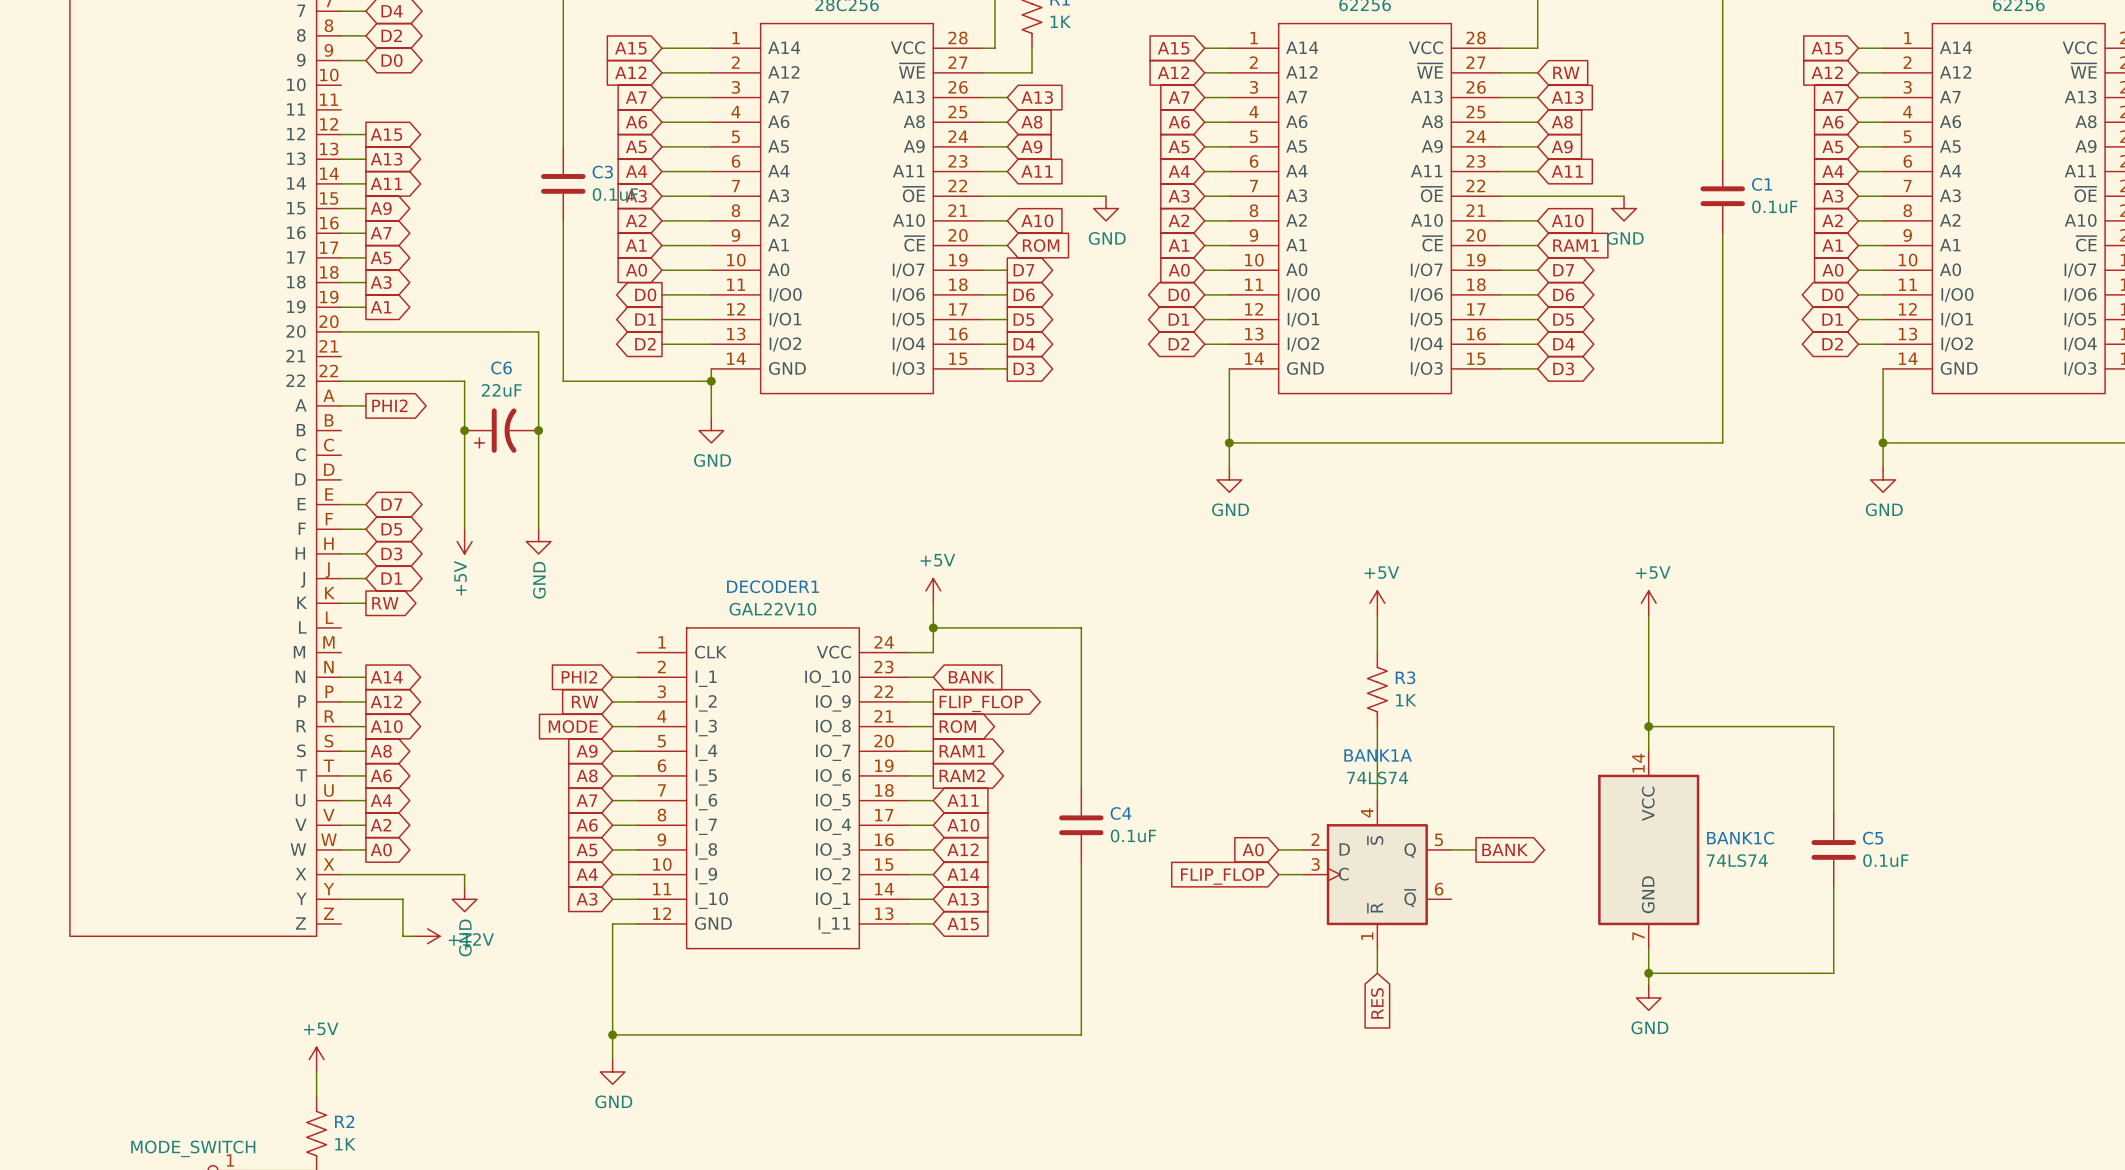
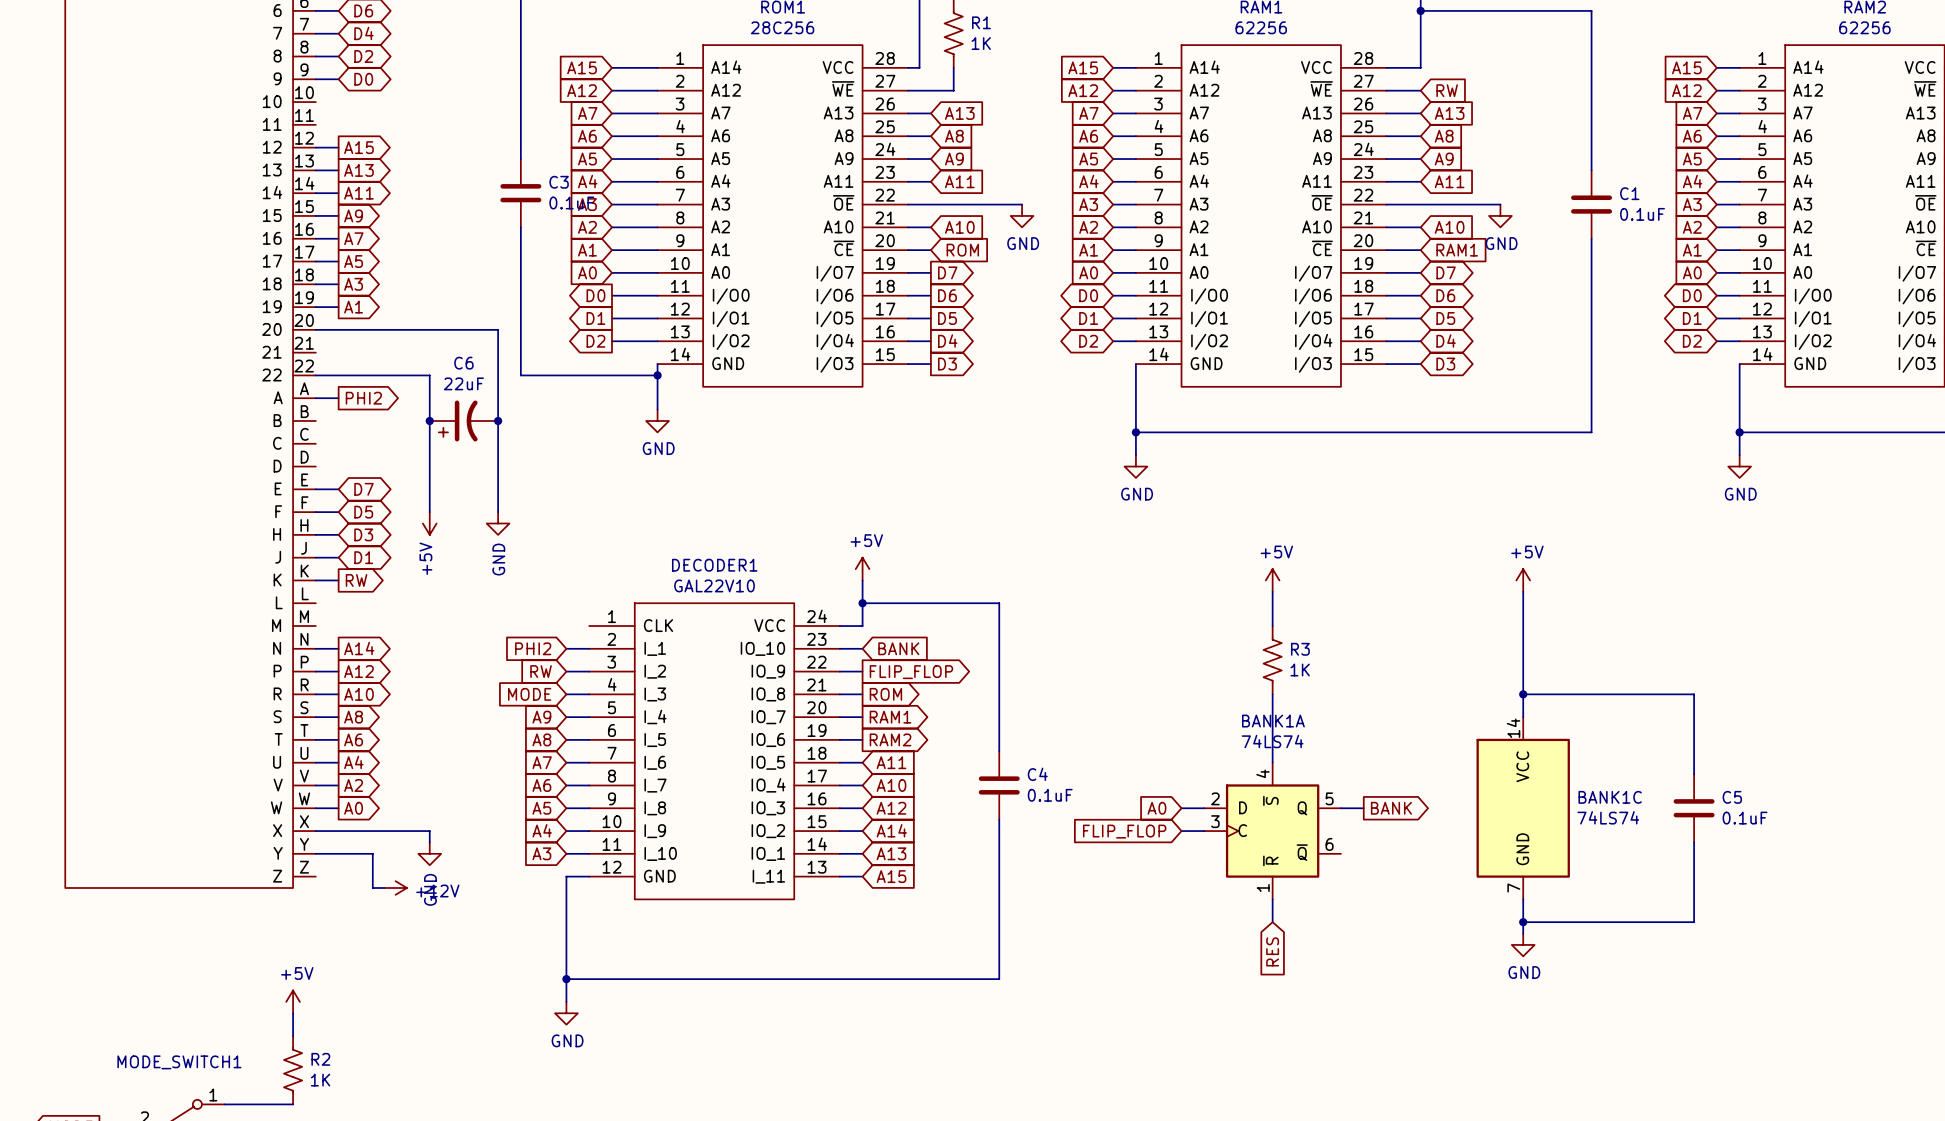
MODE_SWITCH1 name: none -> MODE_SWITCH1 (179, 1062)
MODE_SWITCH1 value: MODE_SWITCH (193, 1148) -> none

